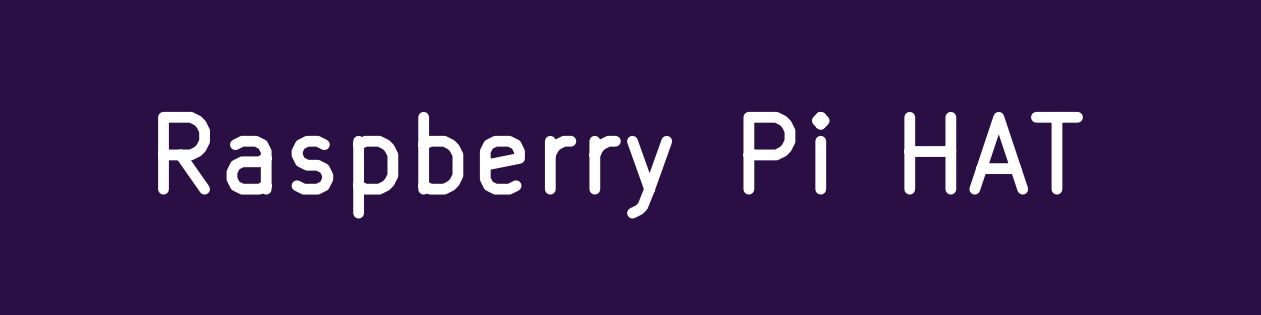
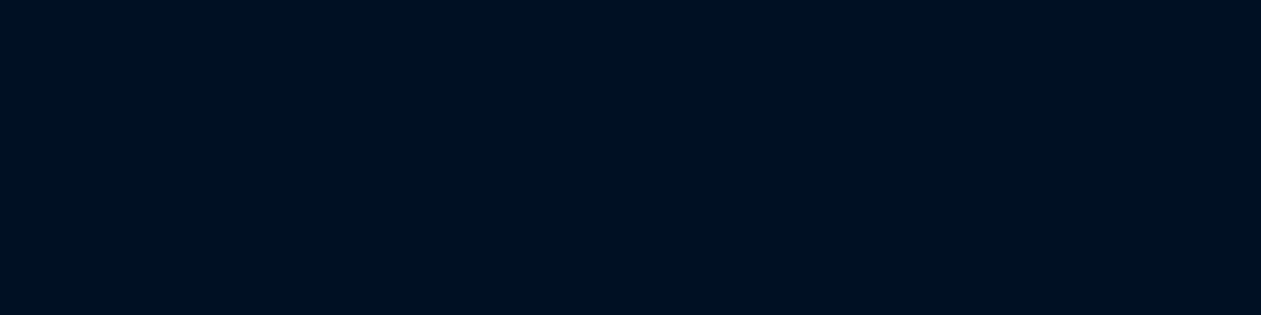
text: Raspberry Pi HAT (620, 165) -> none

